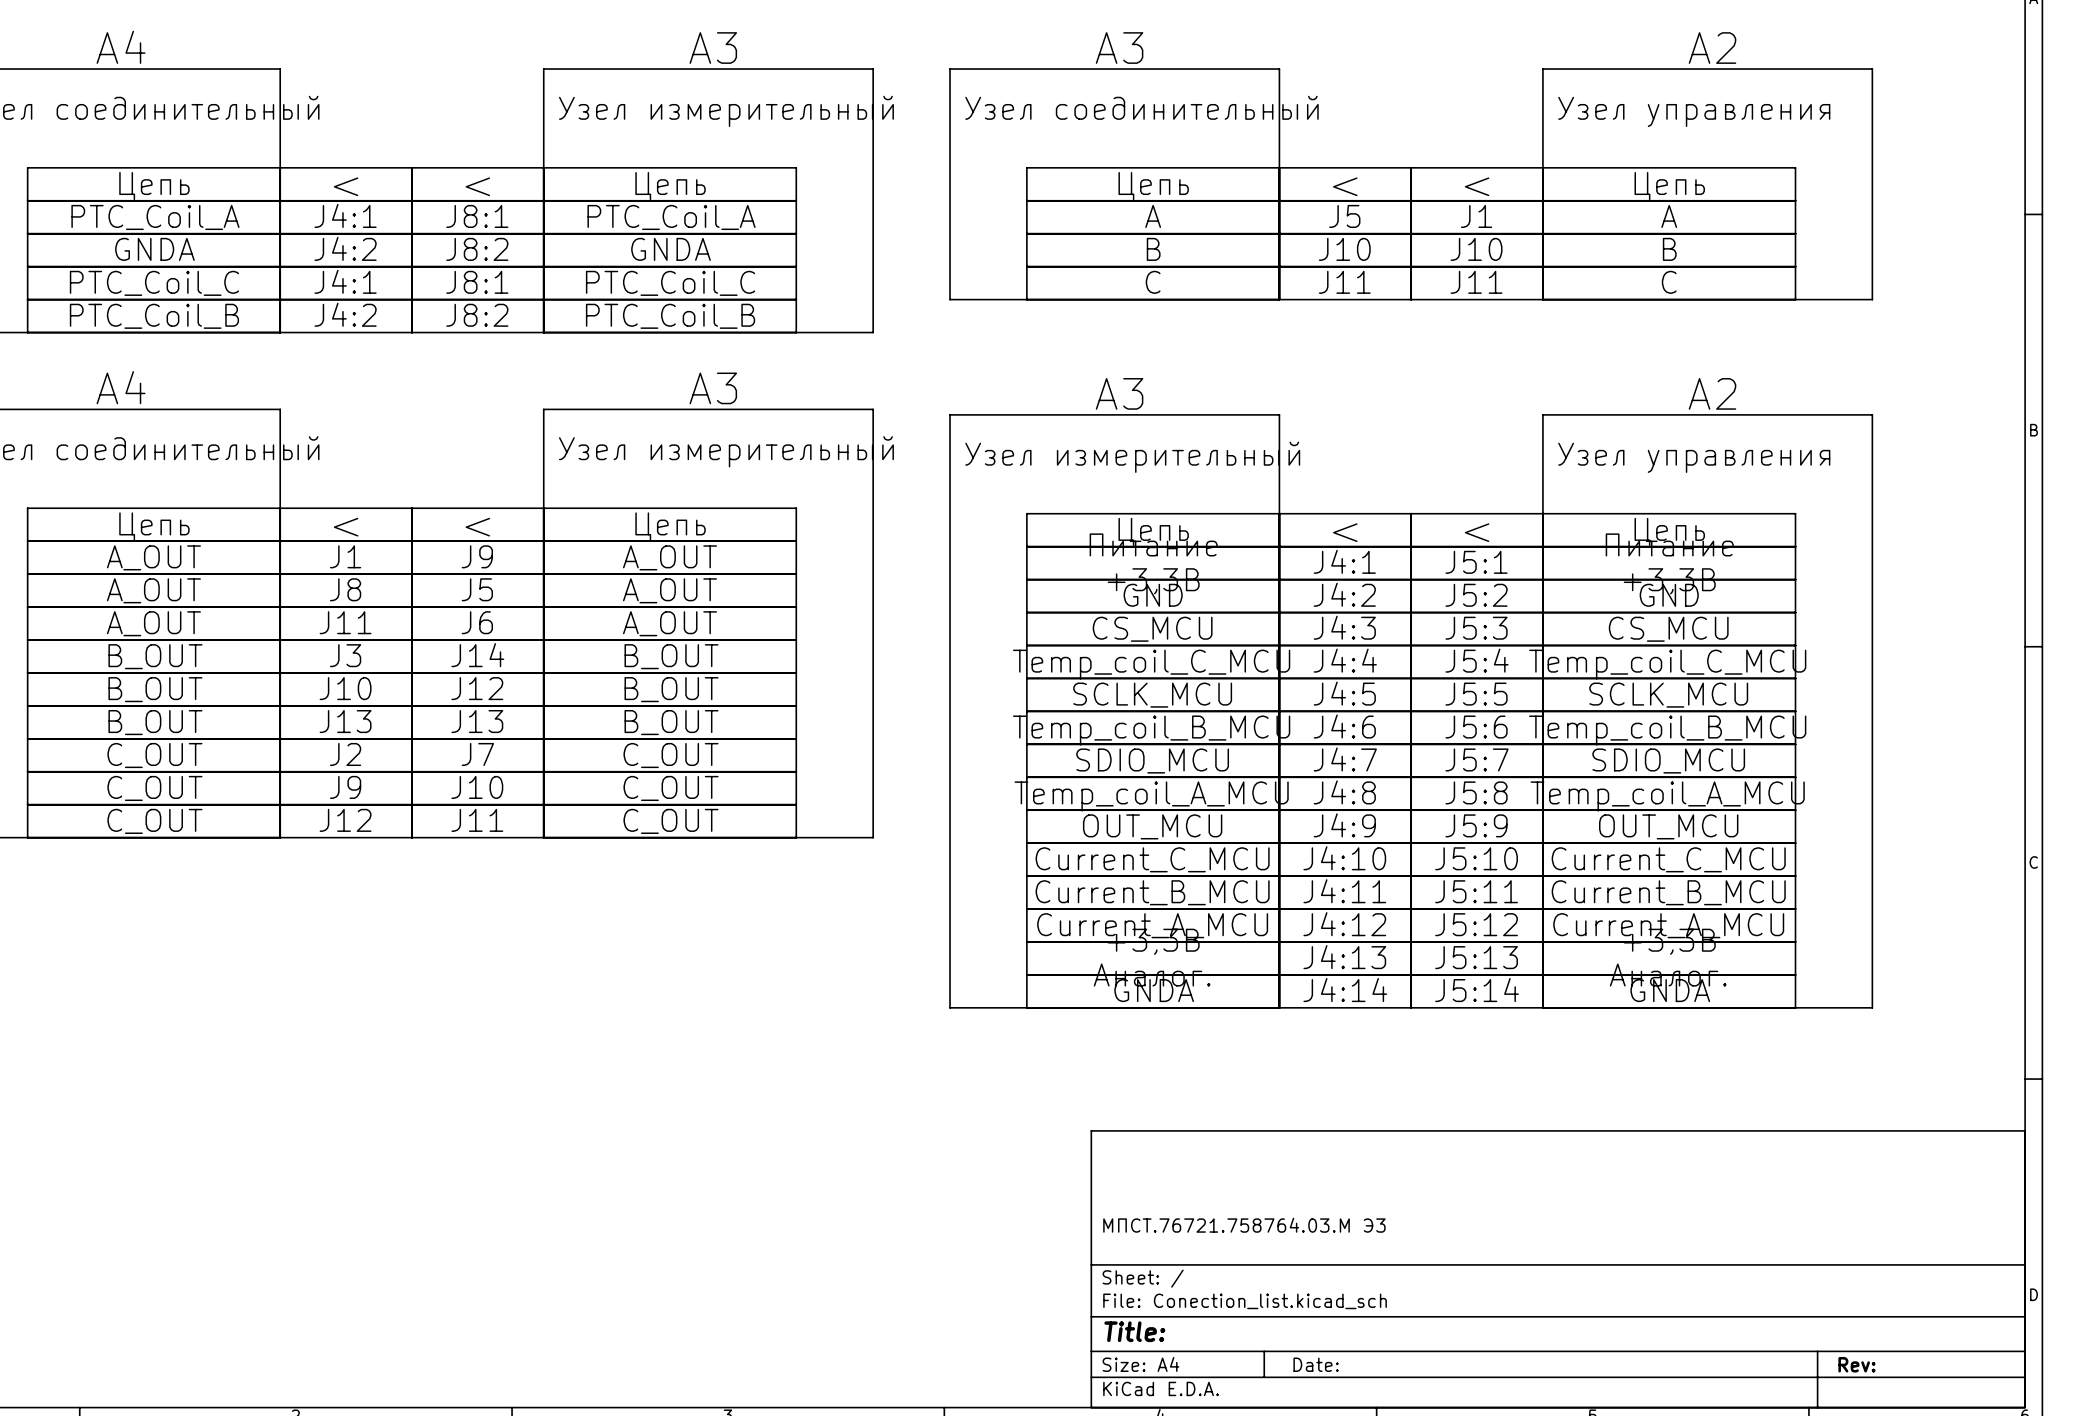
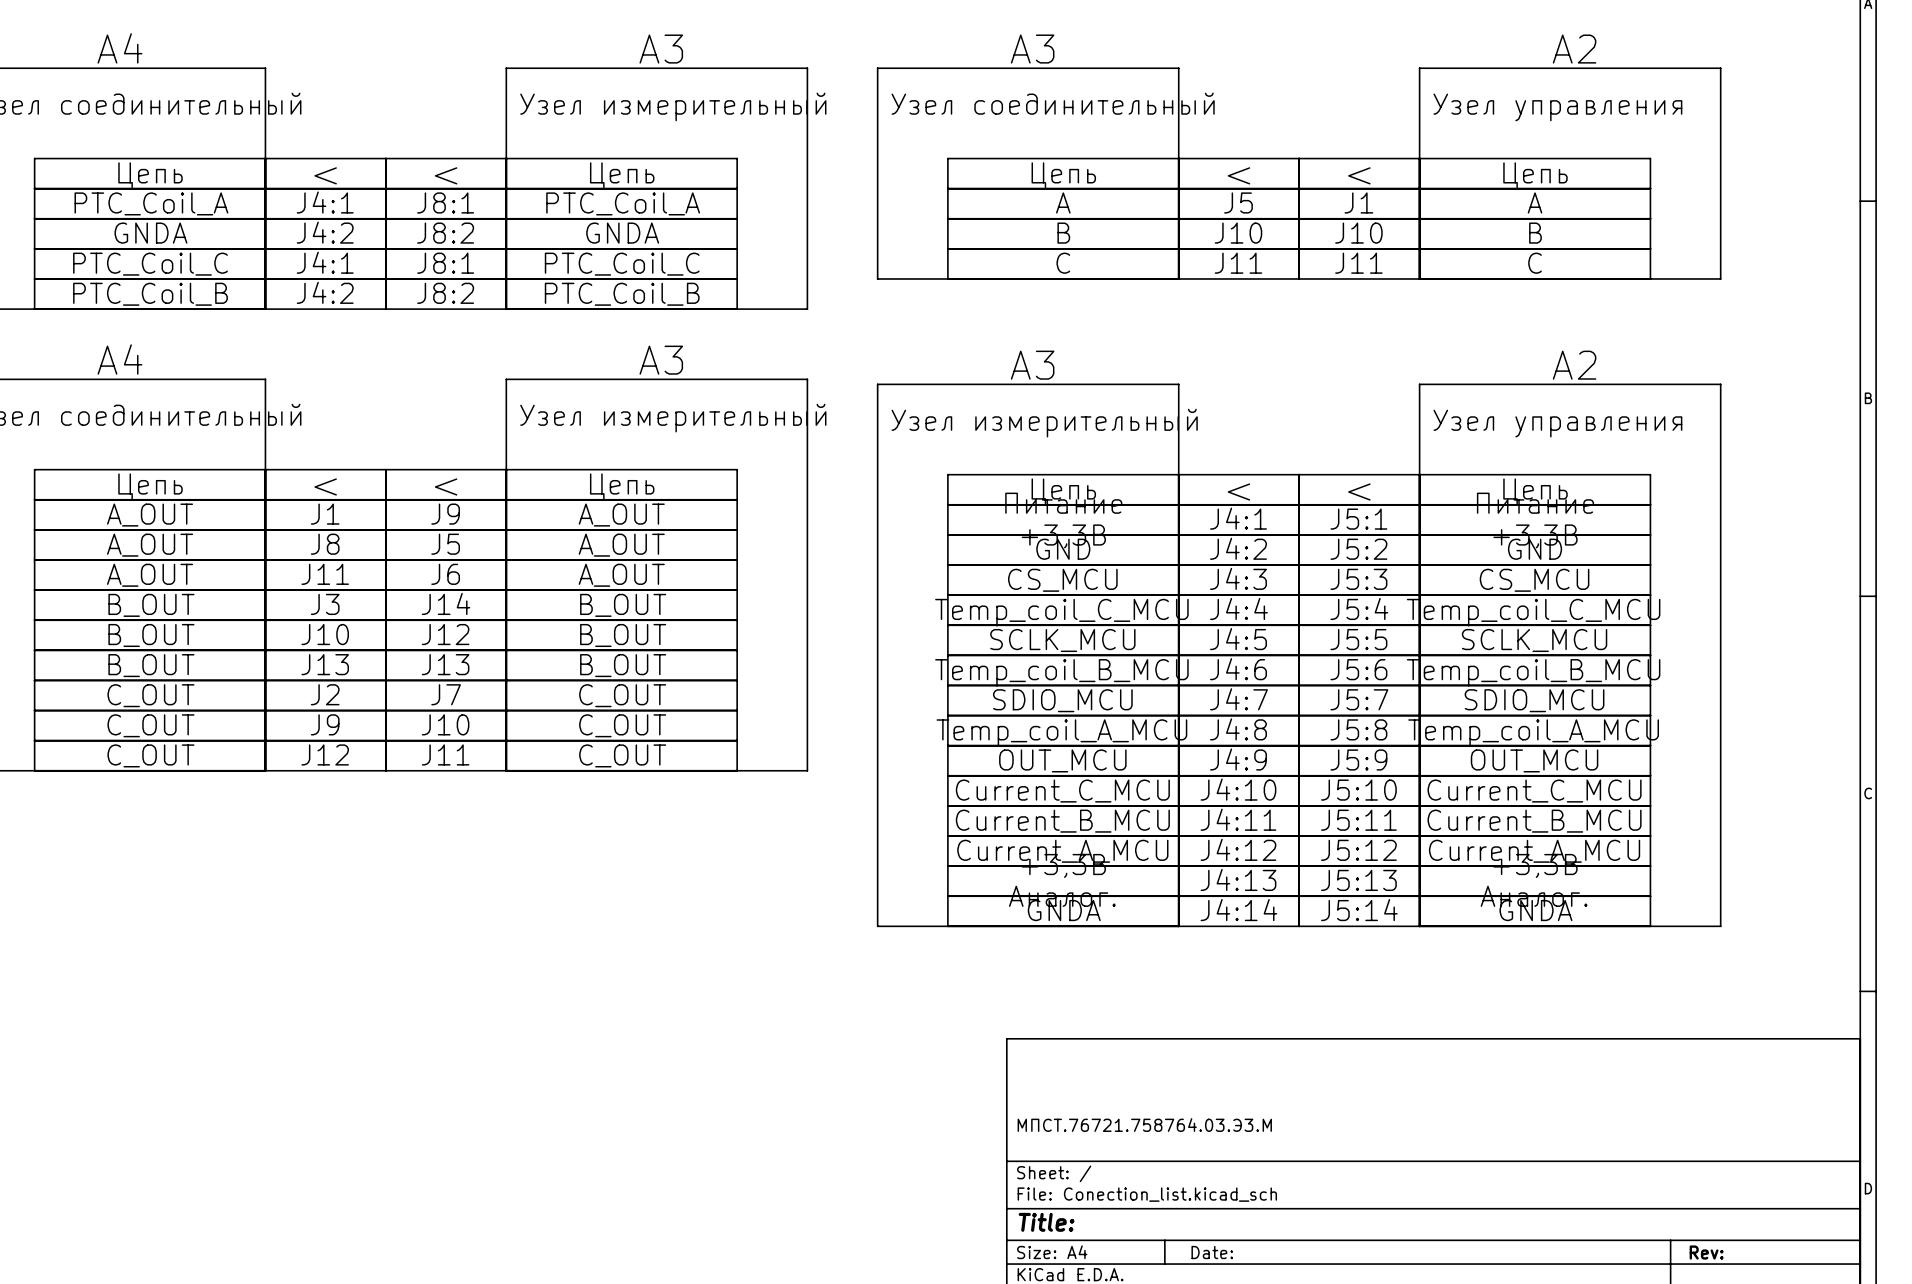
title block: МПСТ.76721.758764.03.М Э3 (1244, 1225) -> МПСТ.76721.758764.03.Э3.М (1144, 1125)

